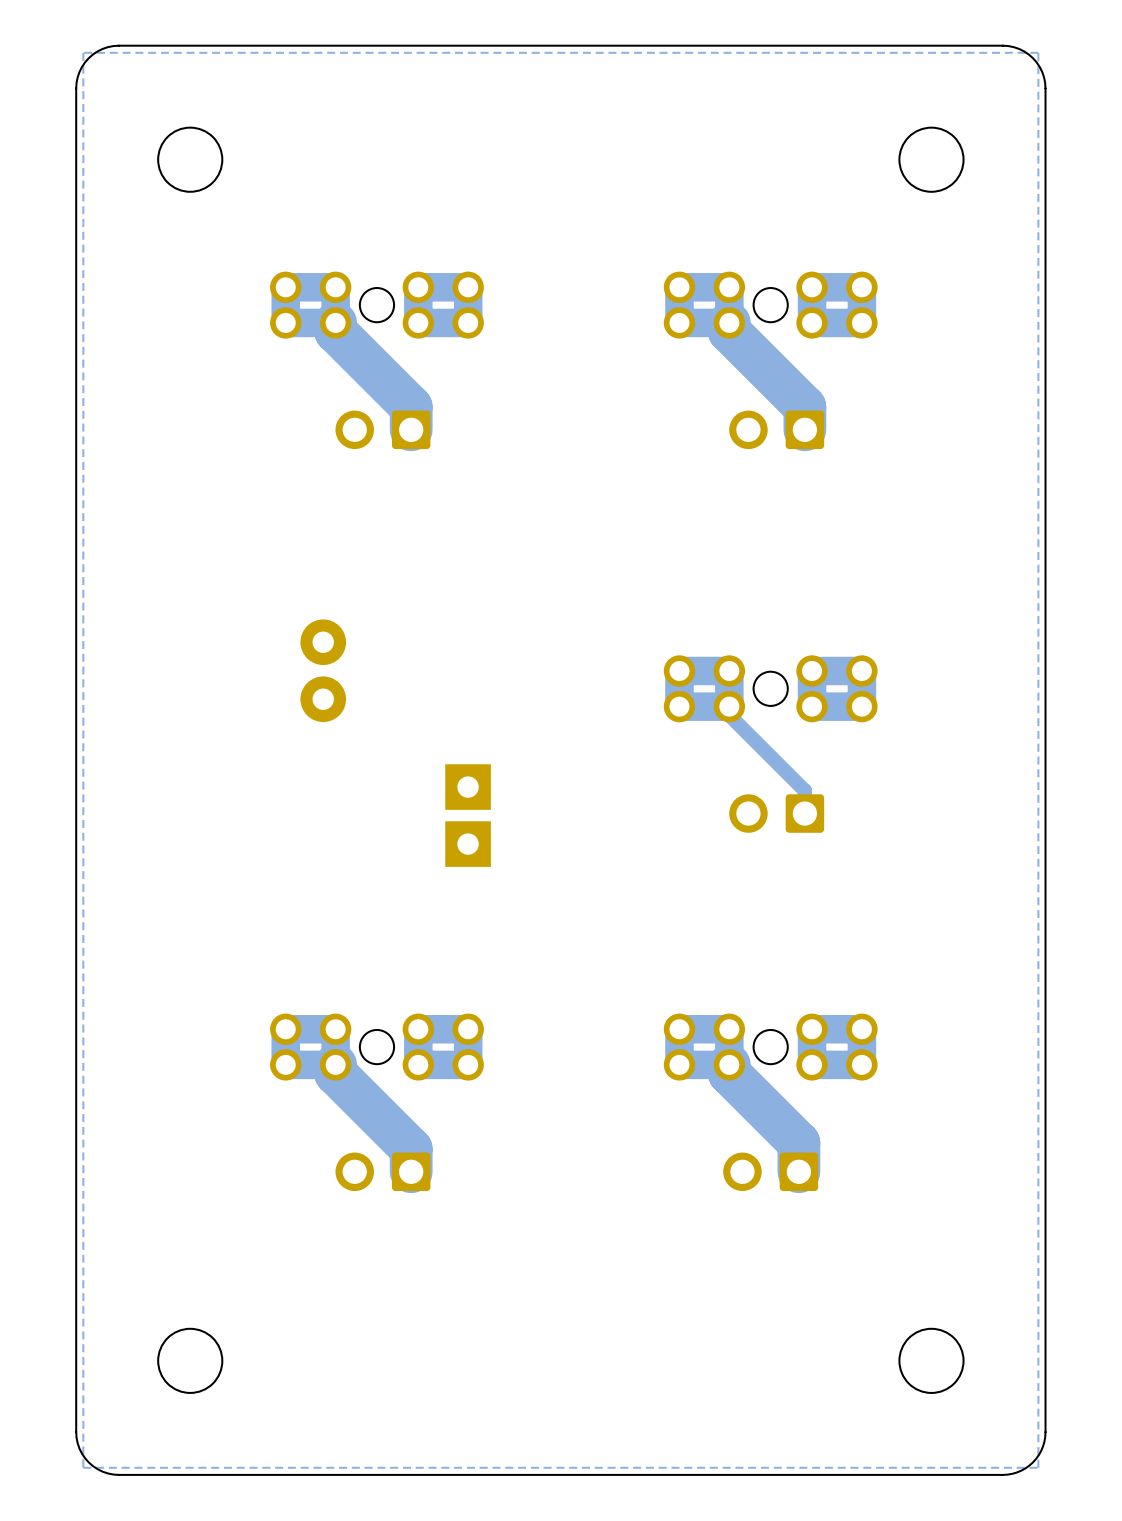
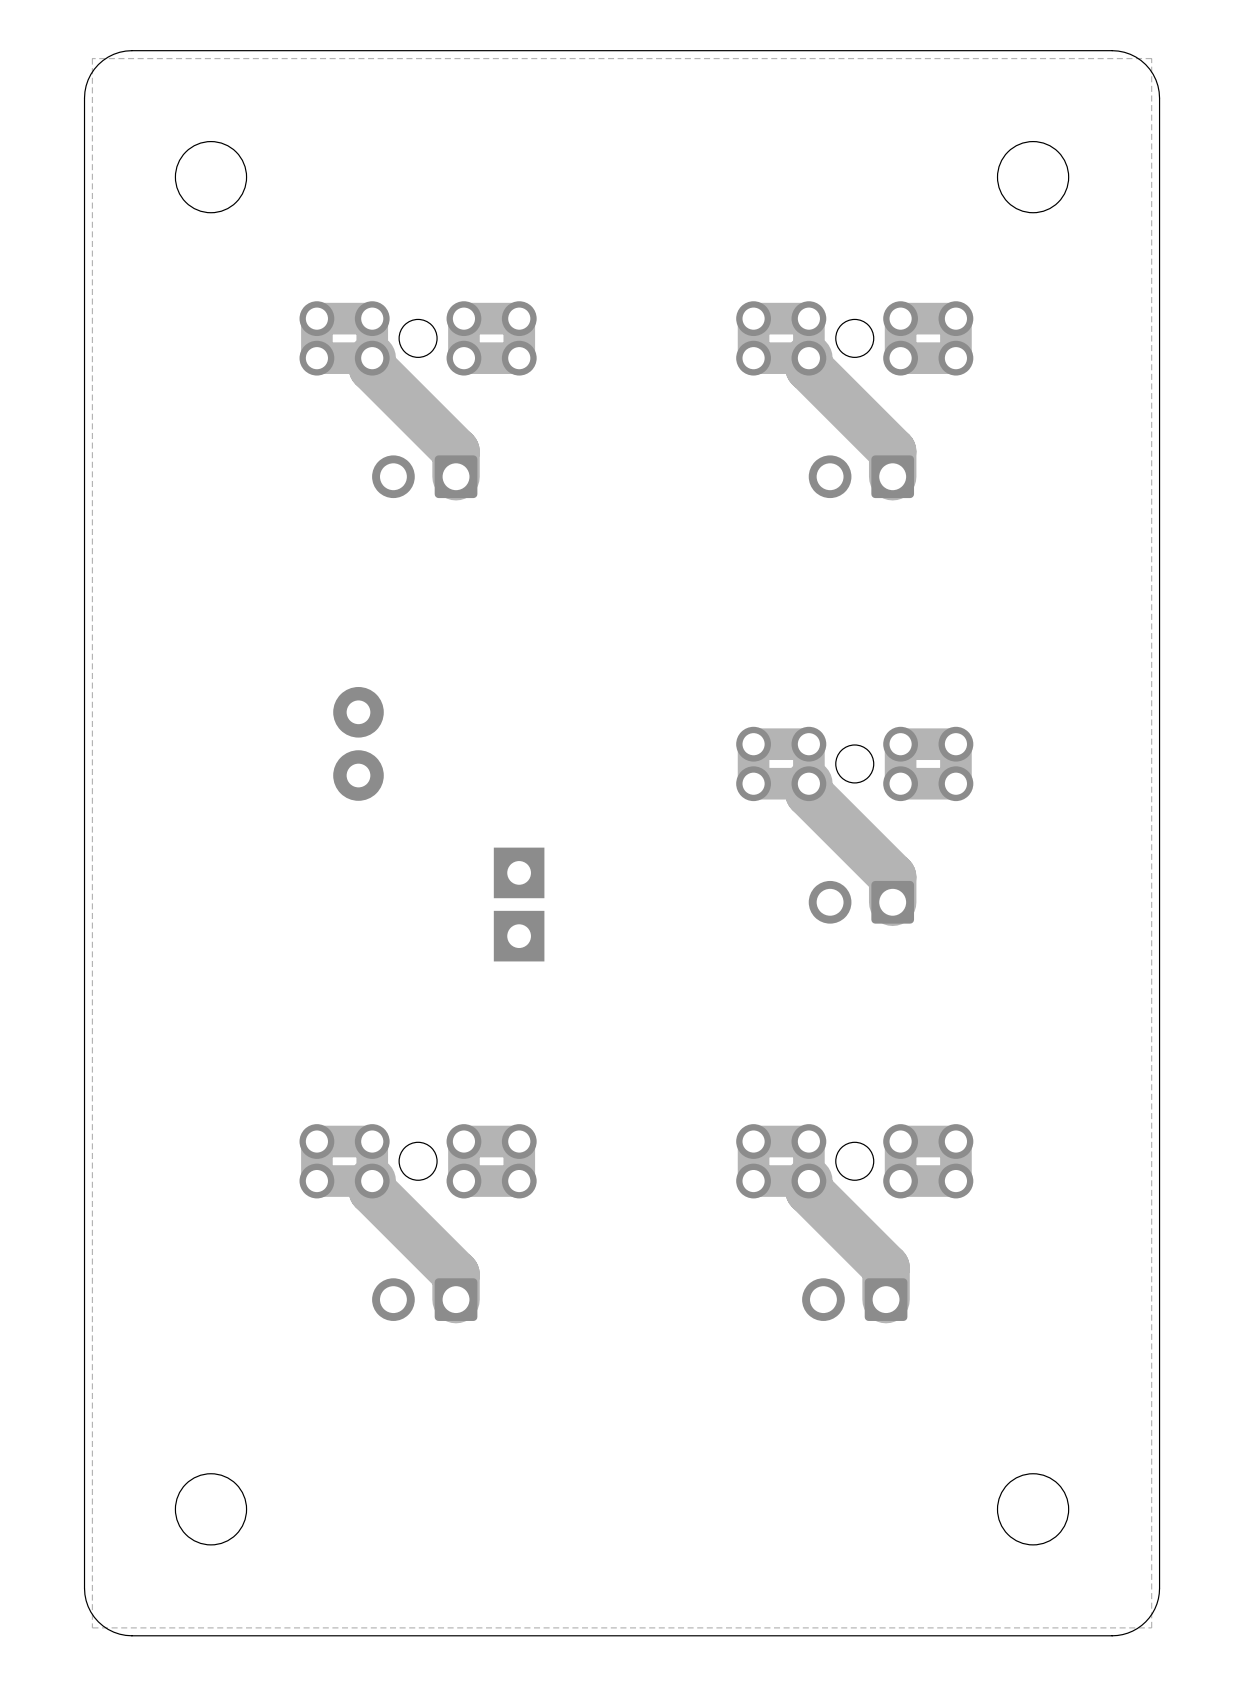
track width: thin (729, 706) (729, 715) (804, 790) (804, 813) -> thick (808, 783) (808, 793) (892, 876) (892, 902)

